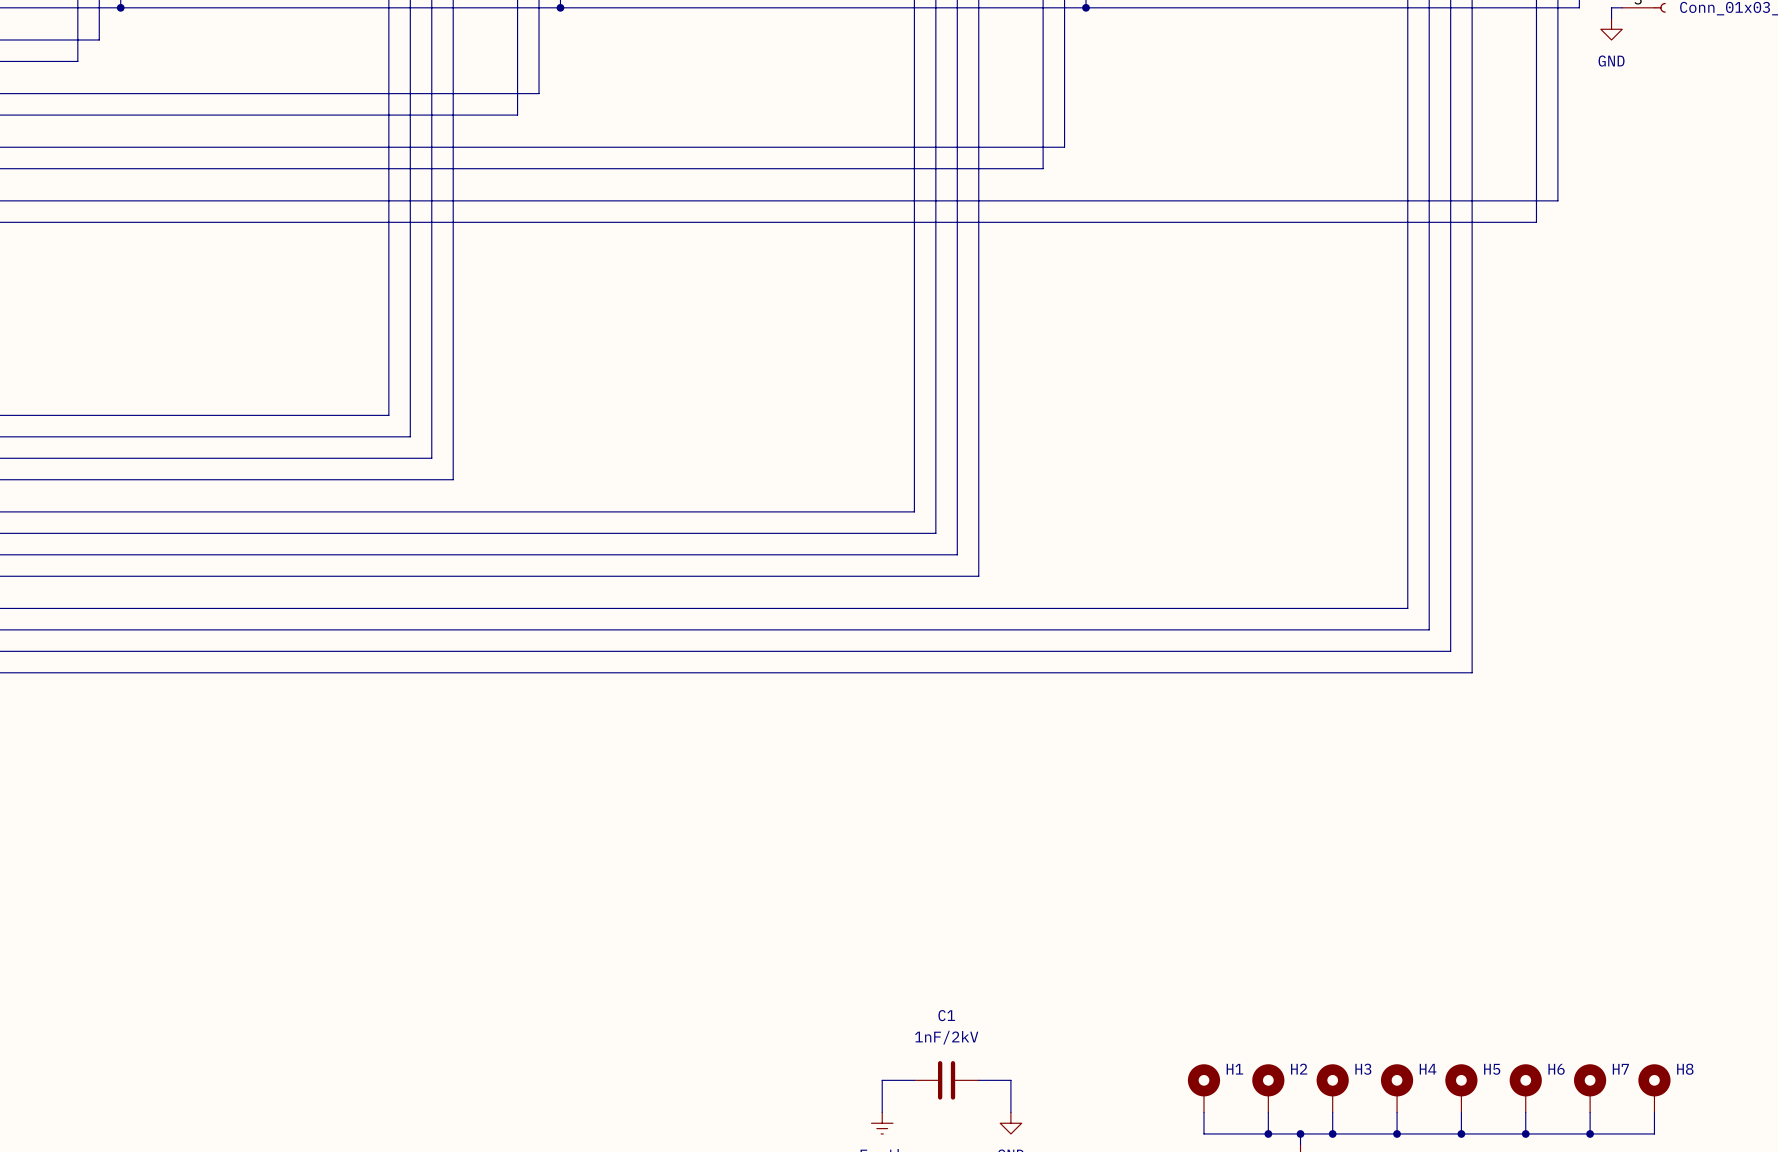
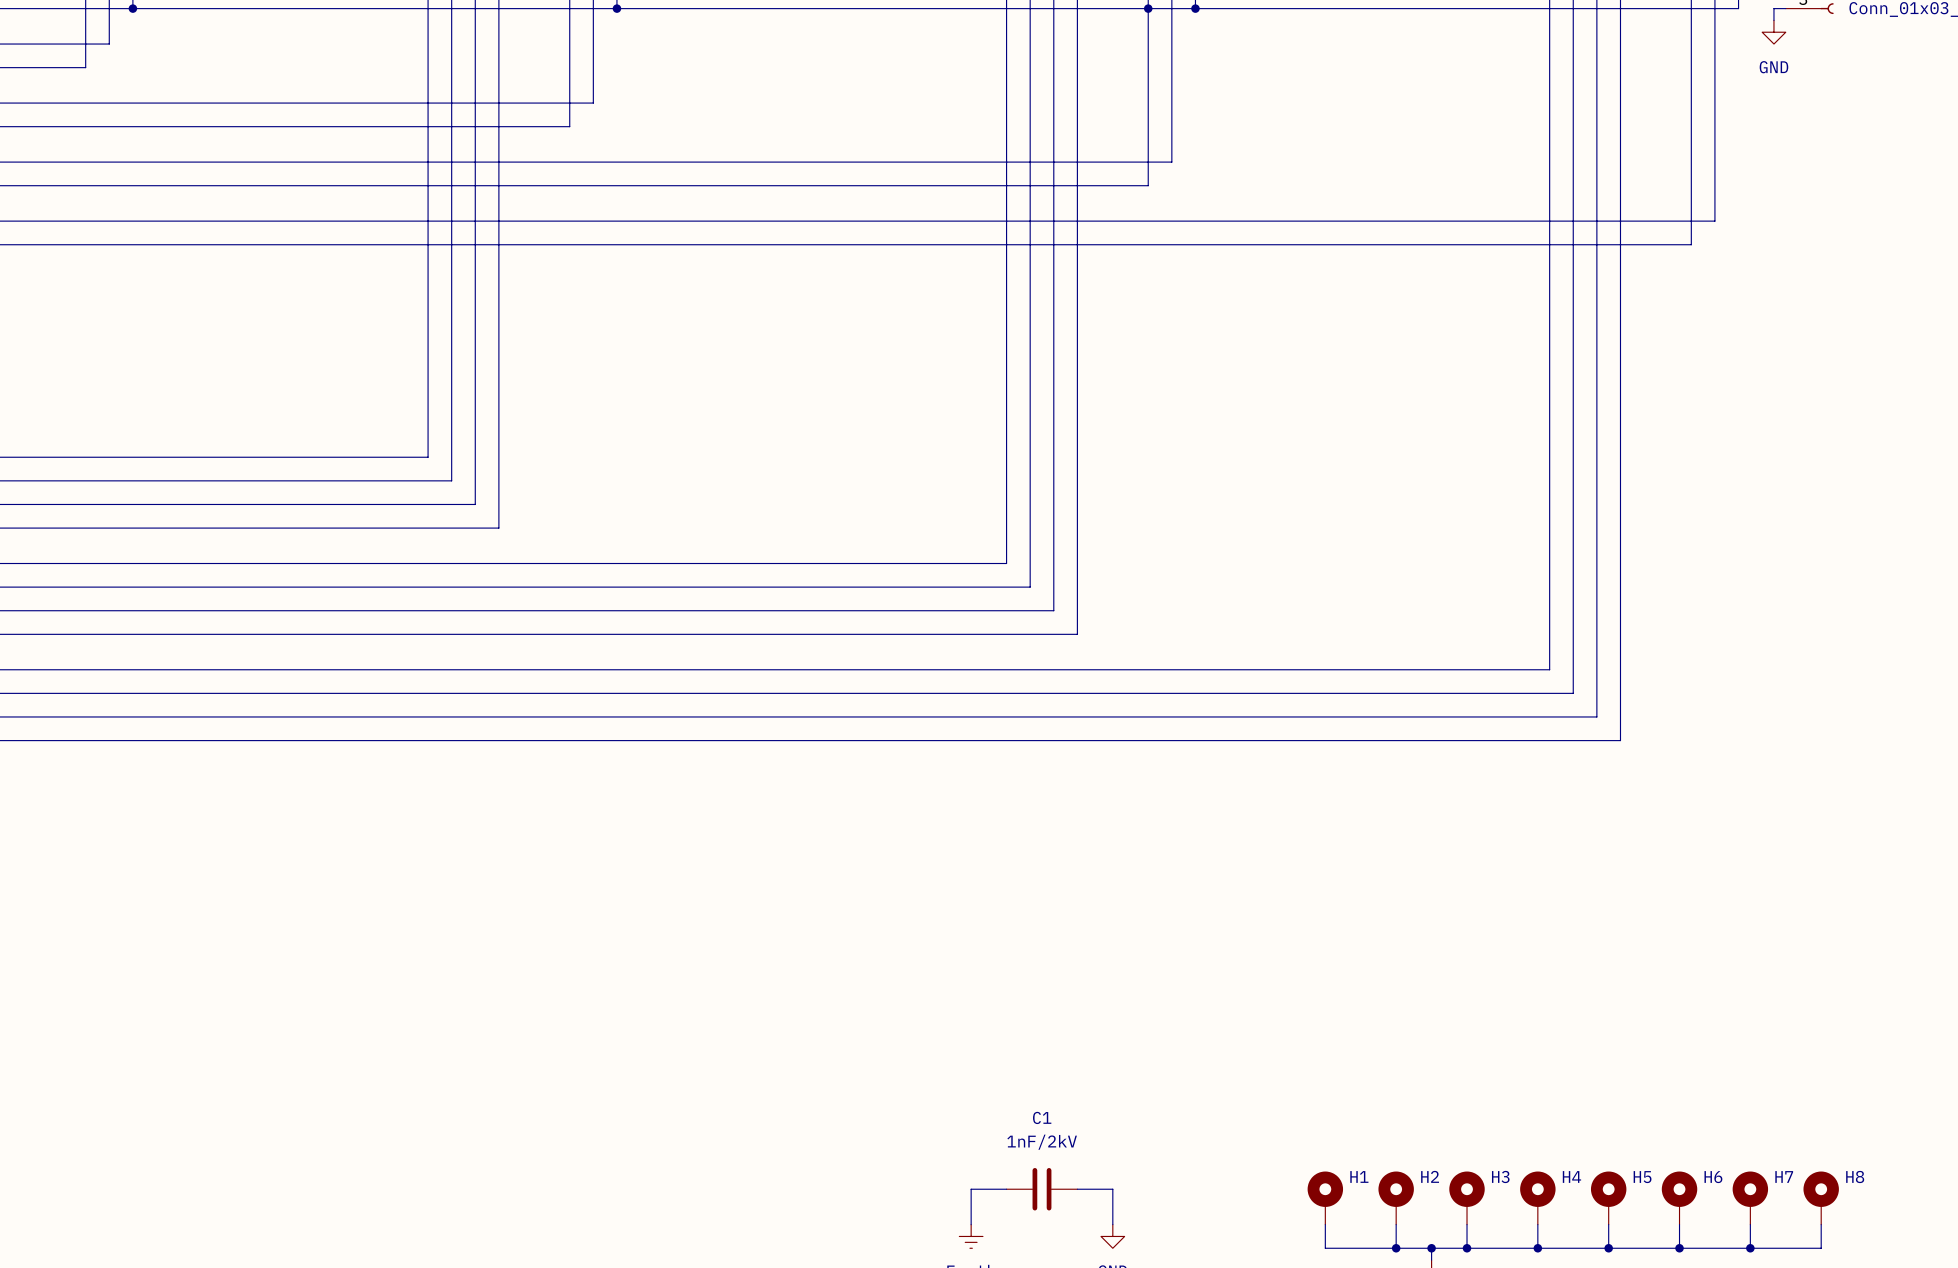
junction: none -> (1148, 8)

